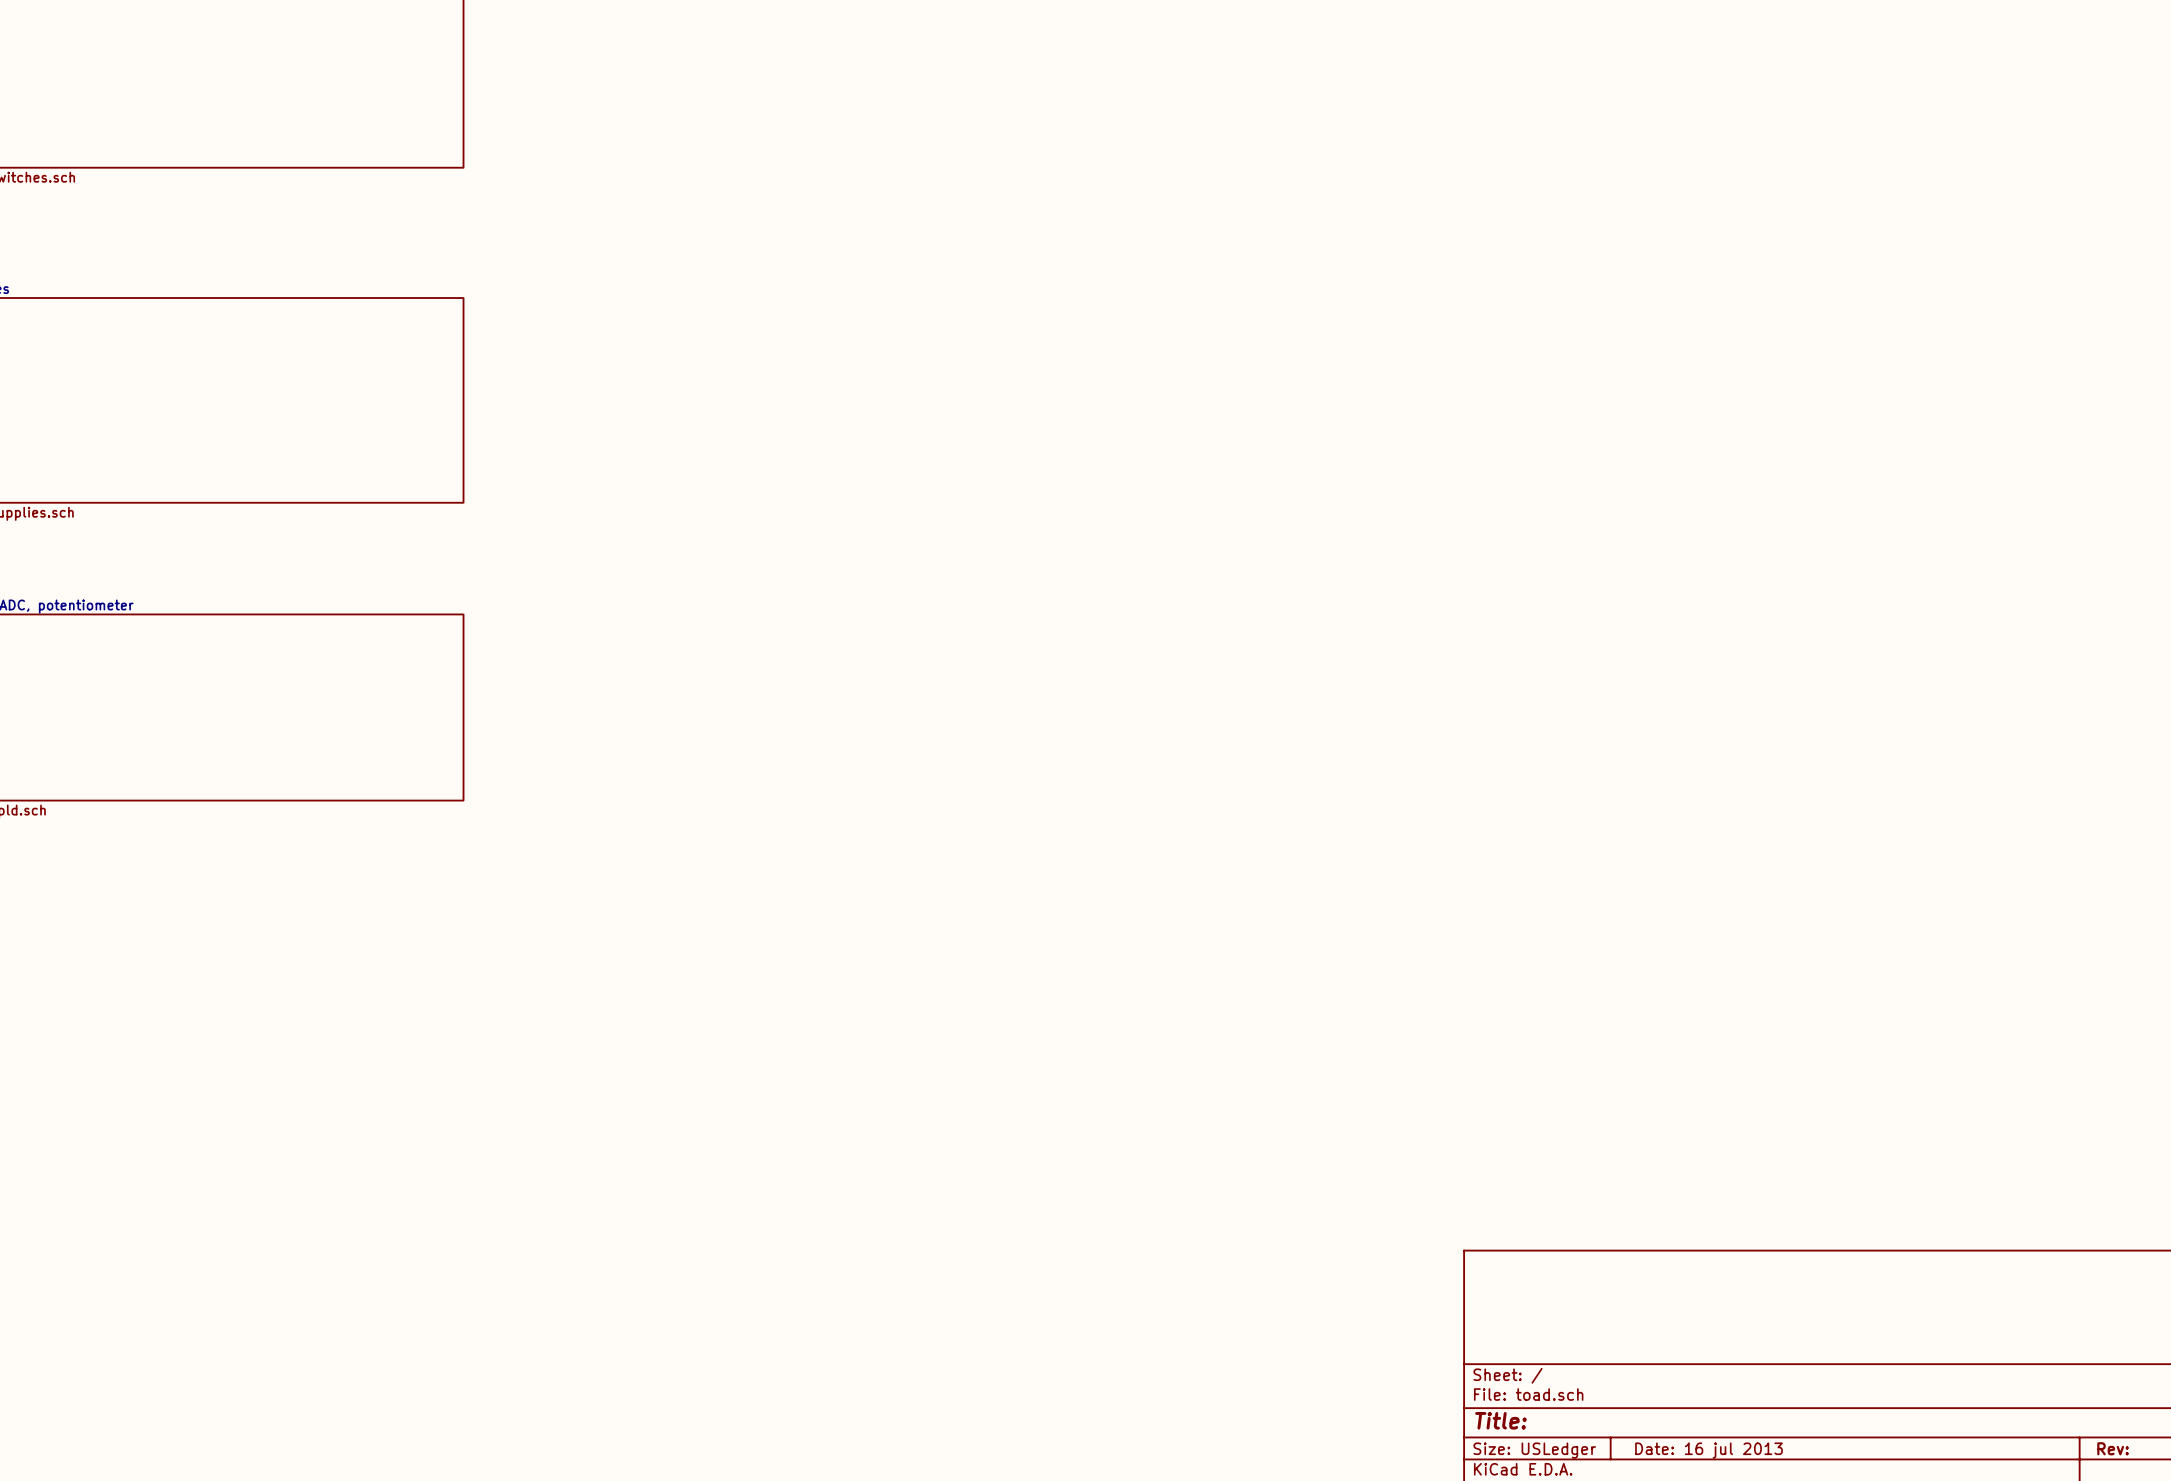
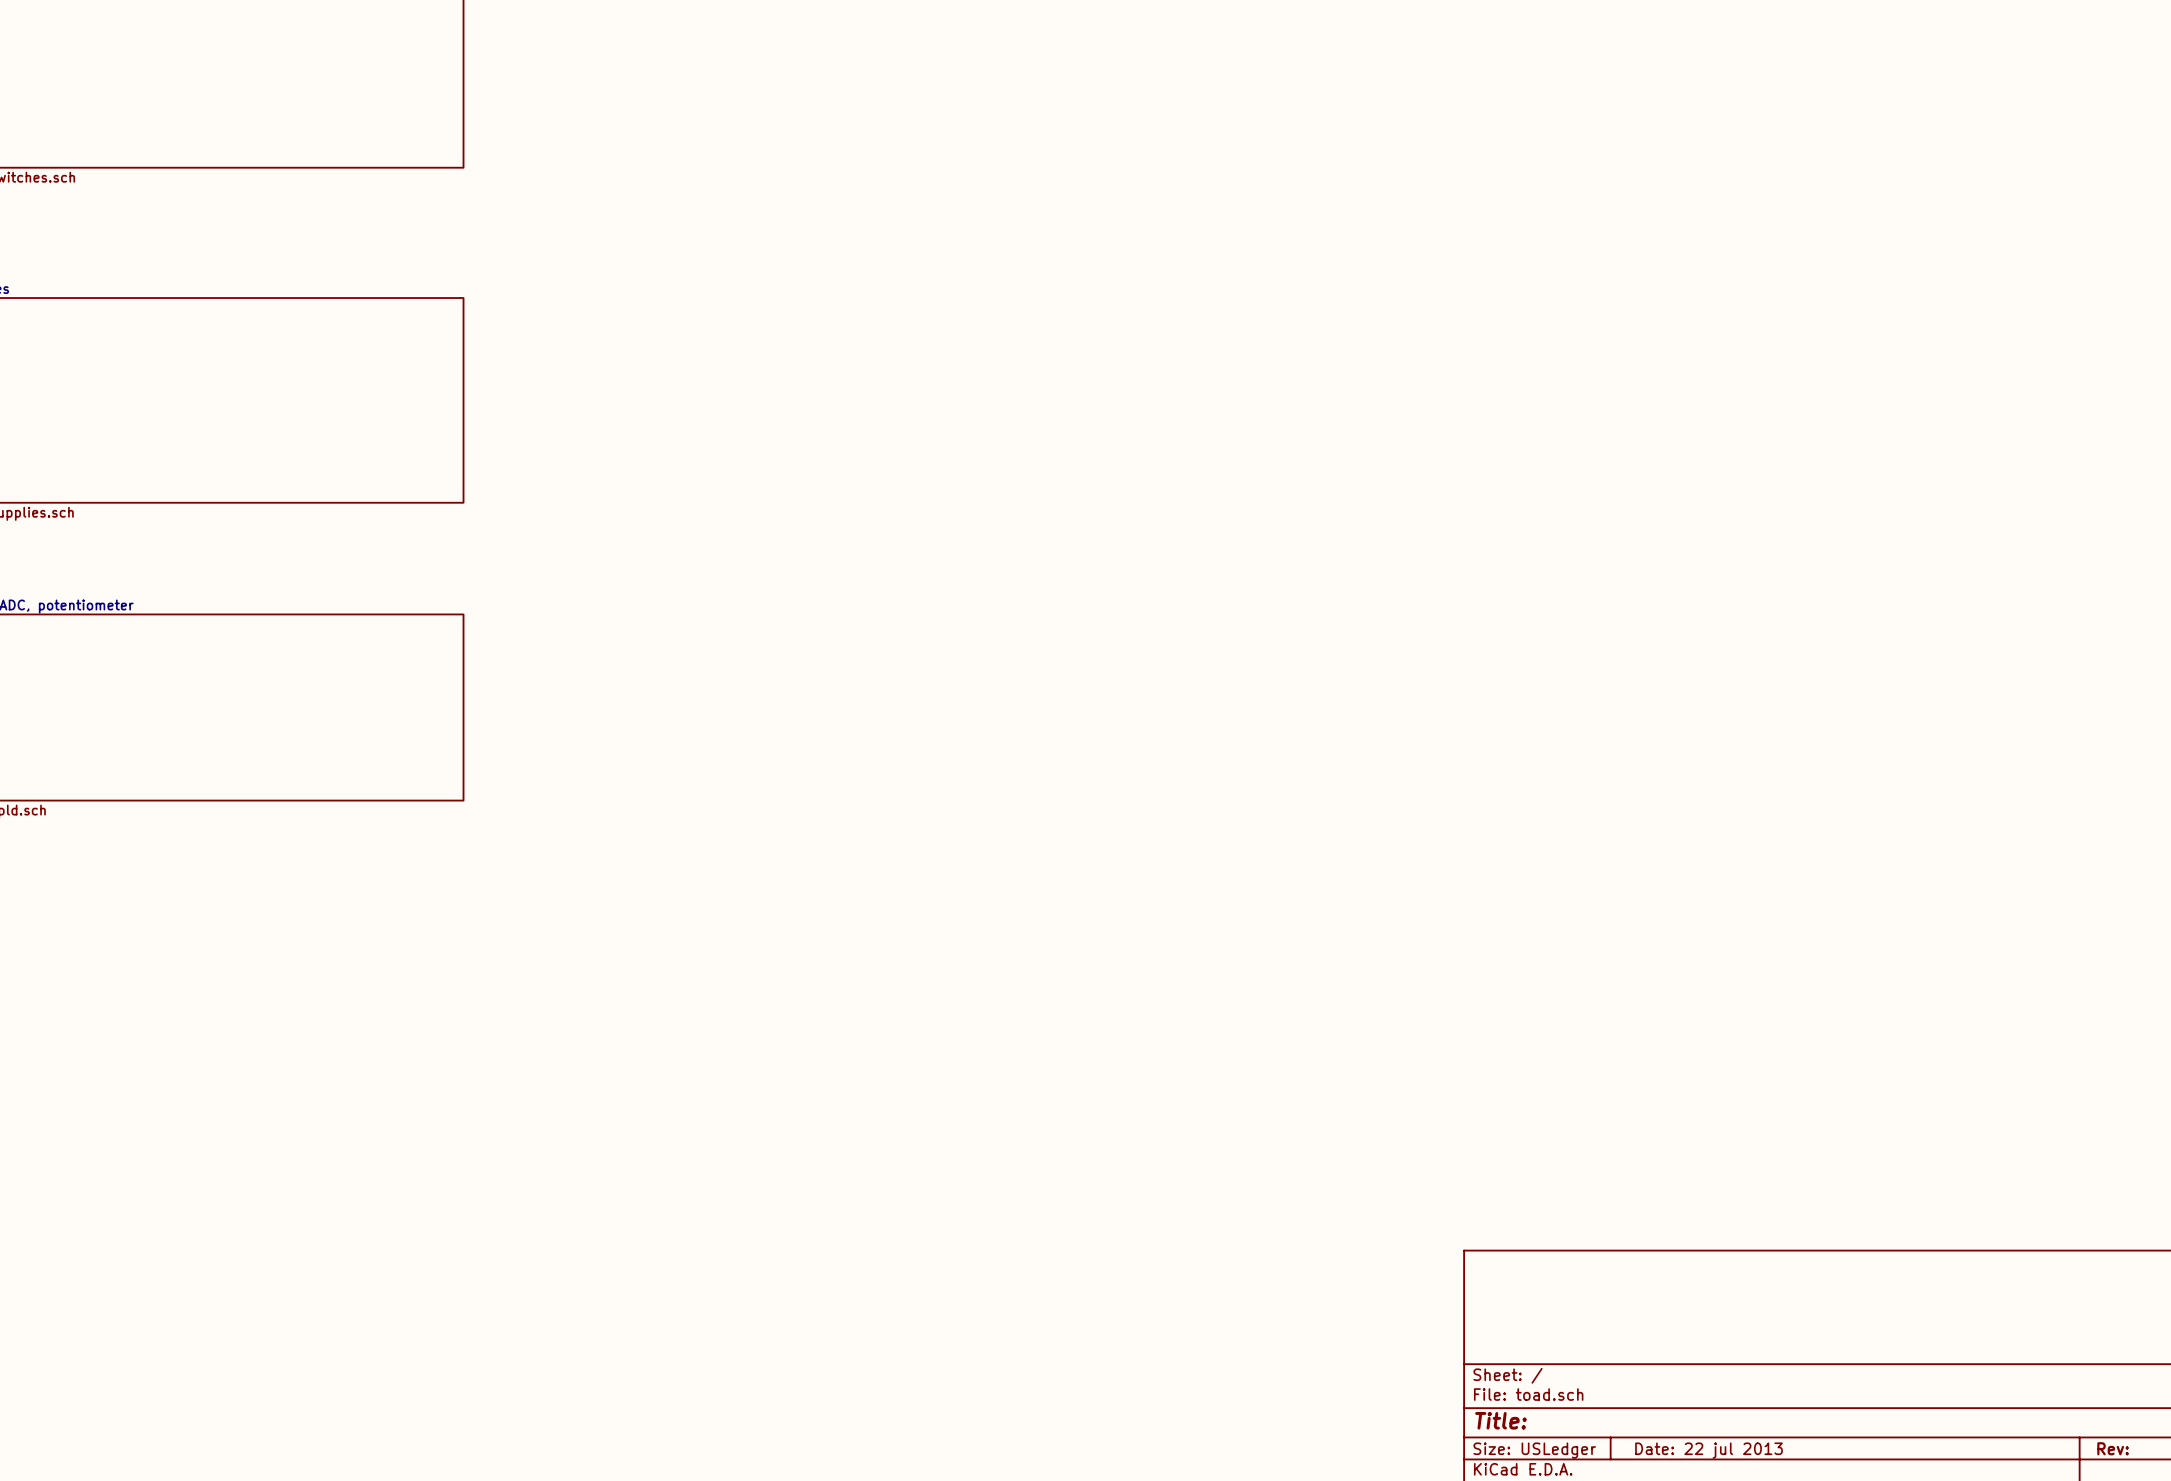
title block: Date: 16 jul 2013 (1709, 1450) -> Date: 22 jul 2013 (1709, 1450)

